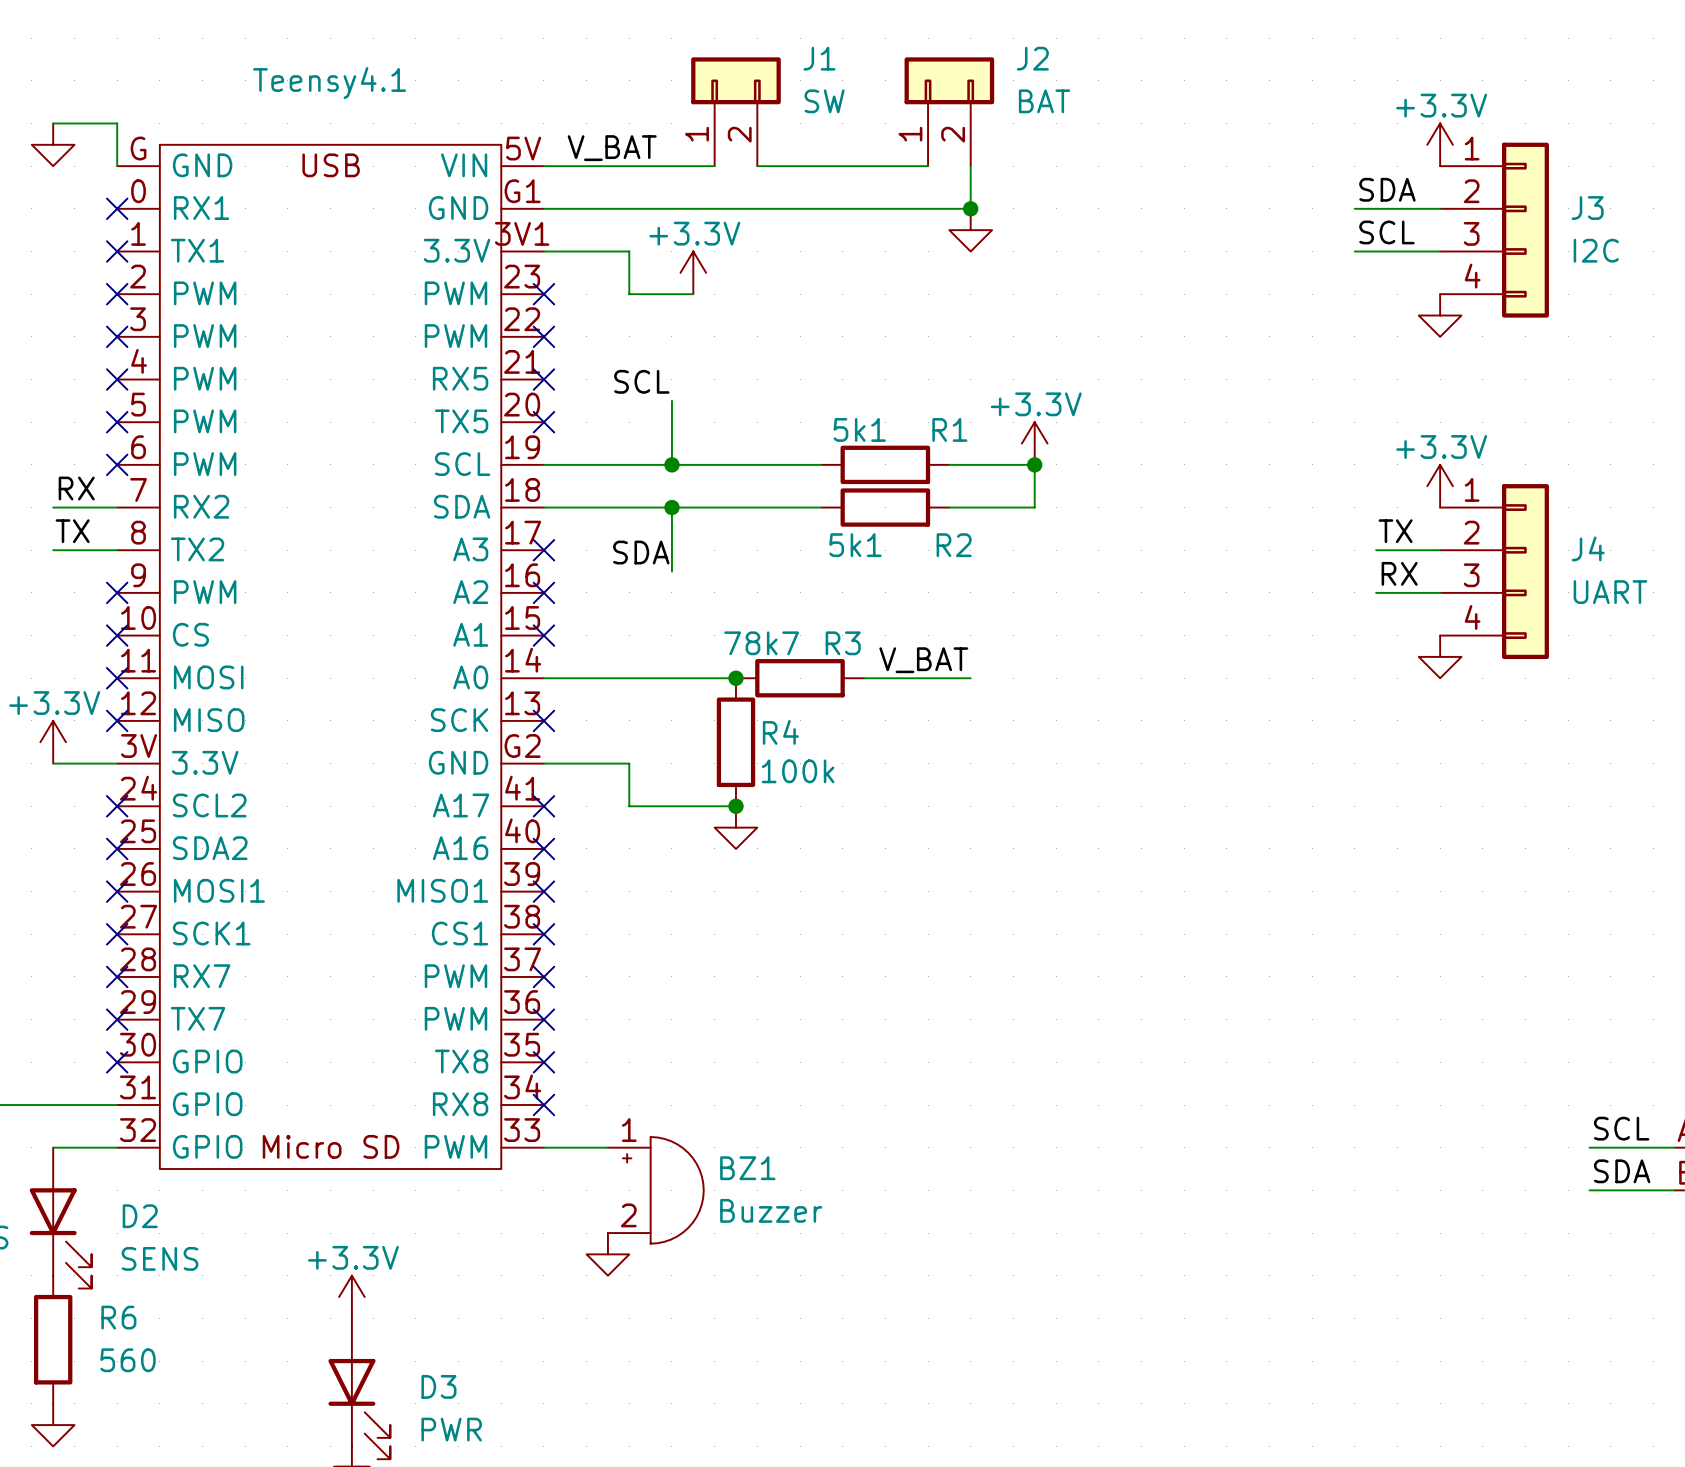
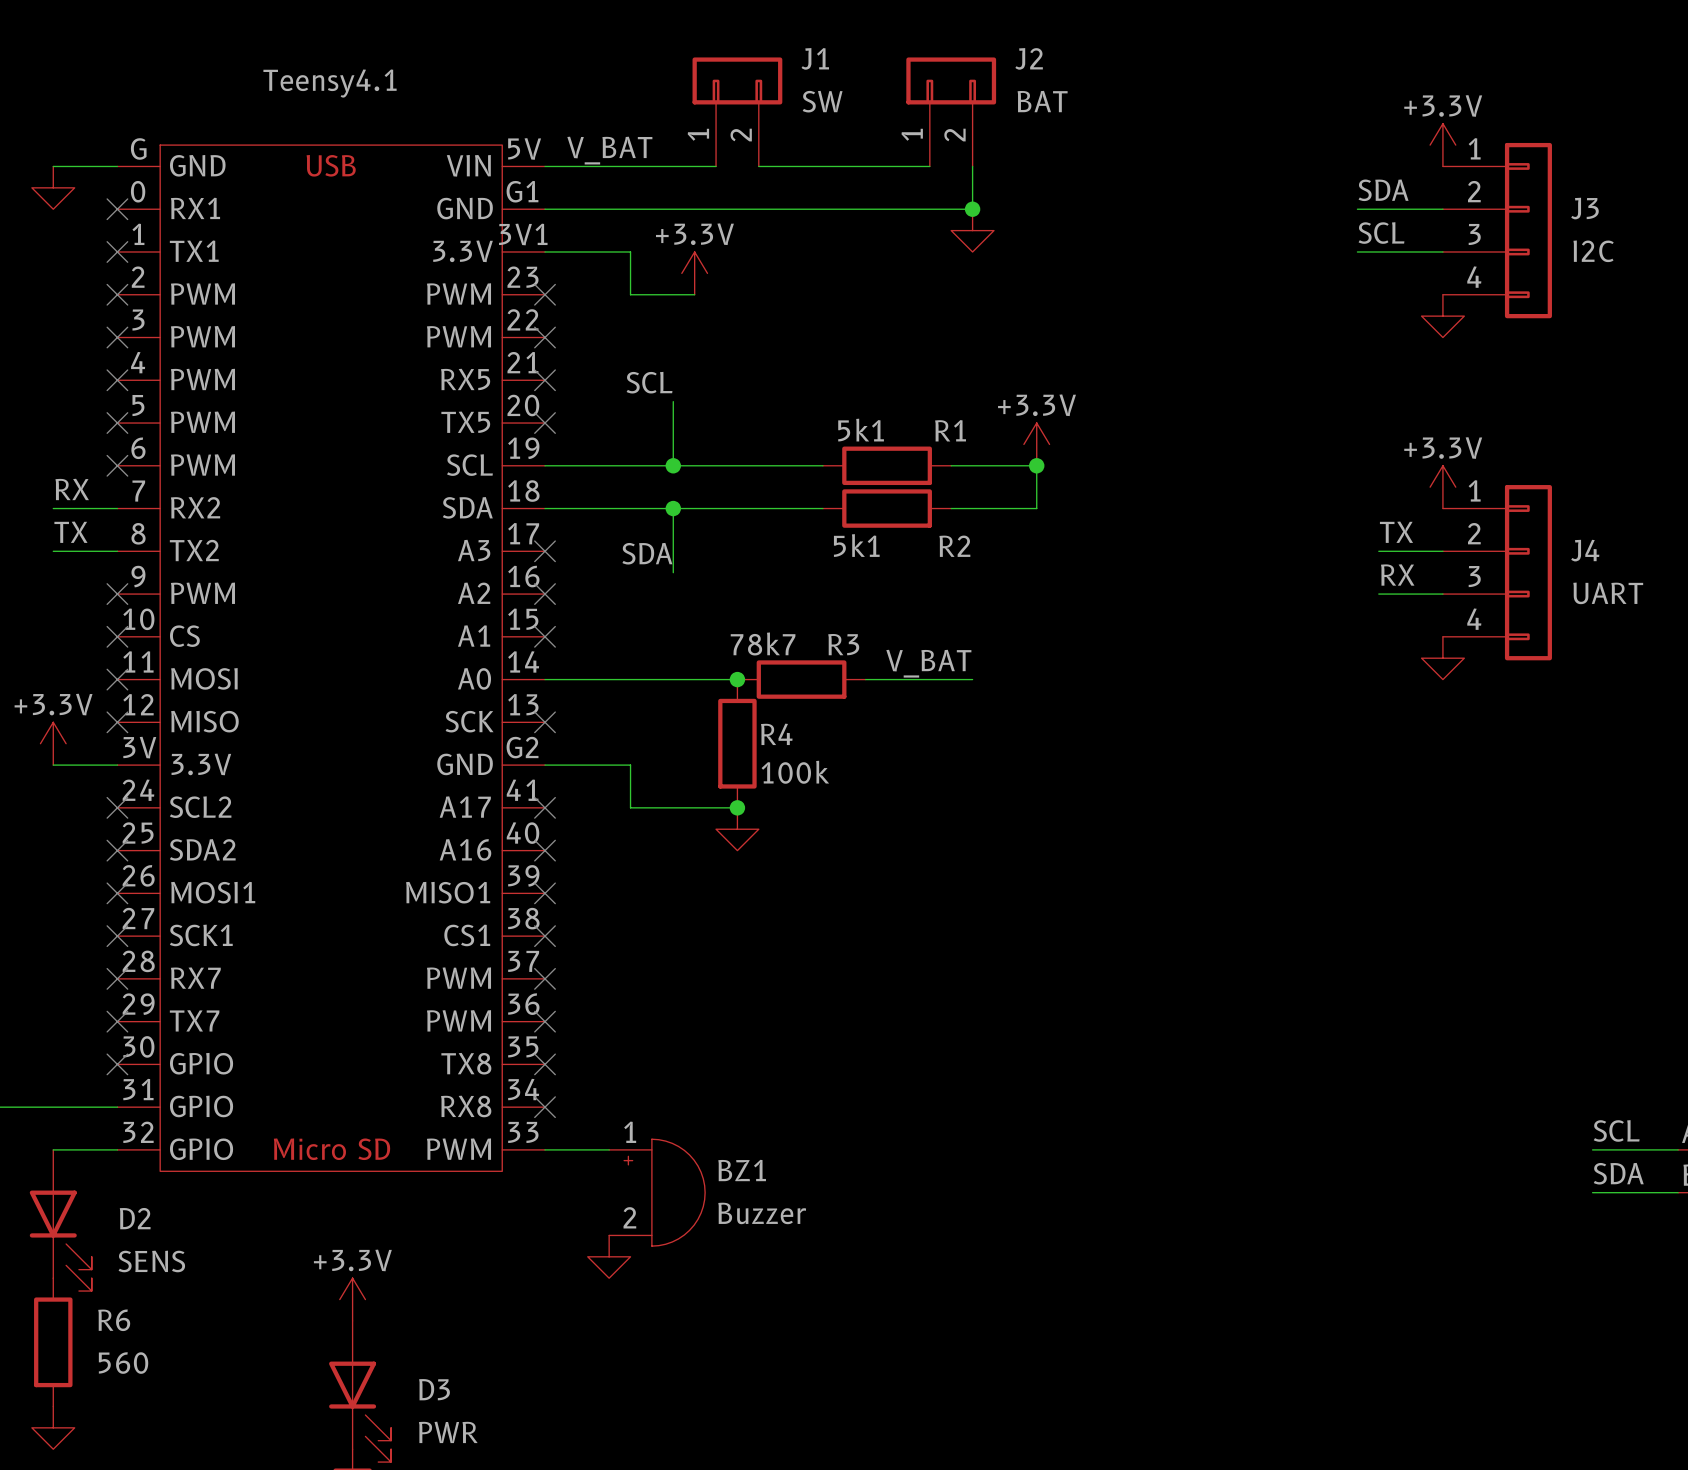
wire: (53, 123) (117, 123) (117, 166) -> (53, 166) (117, 166)
power symbol position: (53, 144) -> (53, 187)

